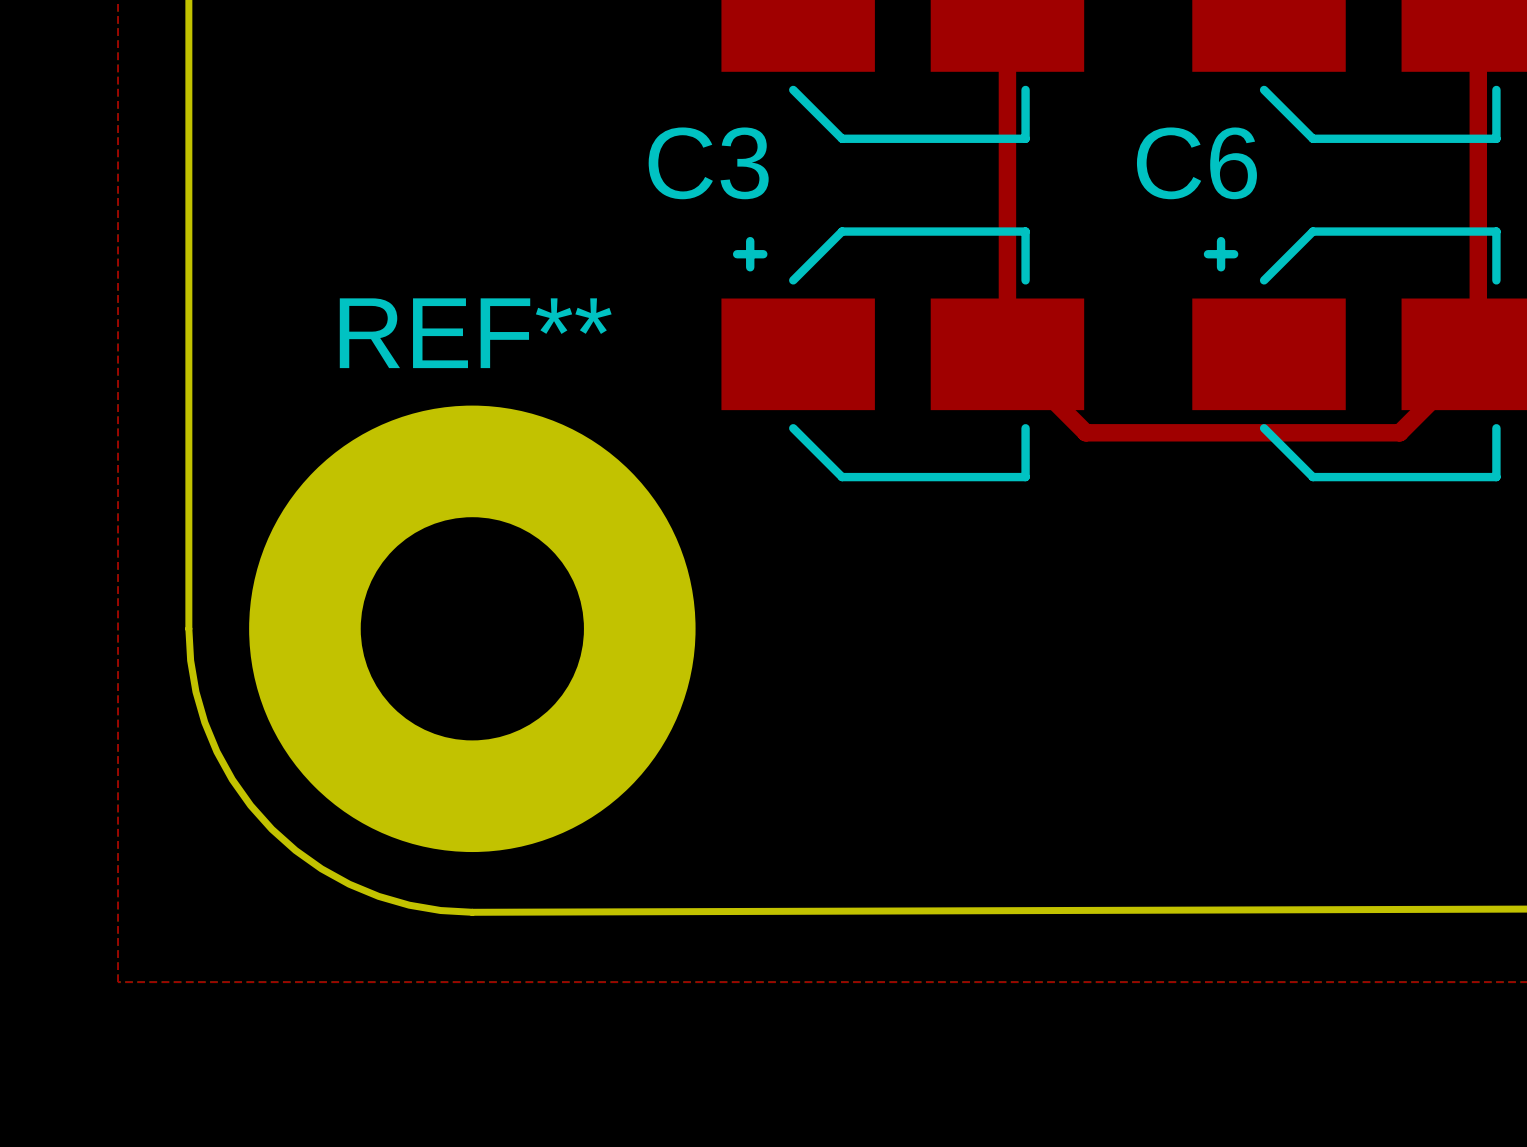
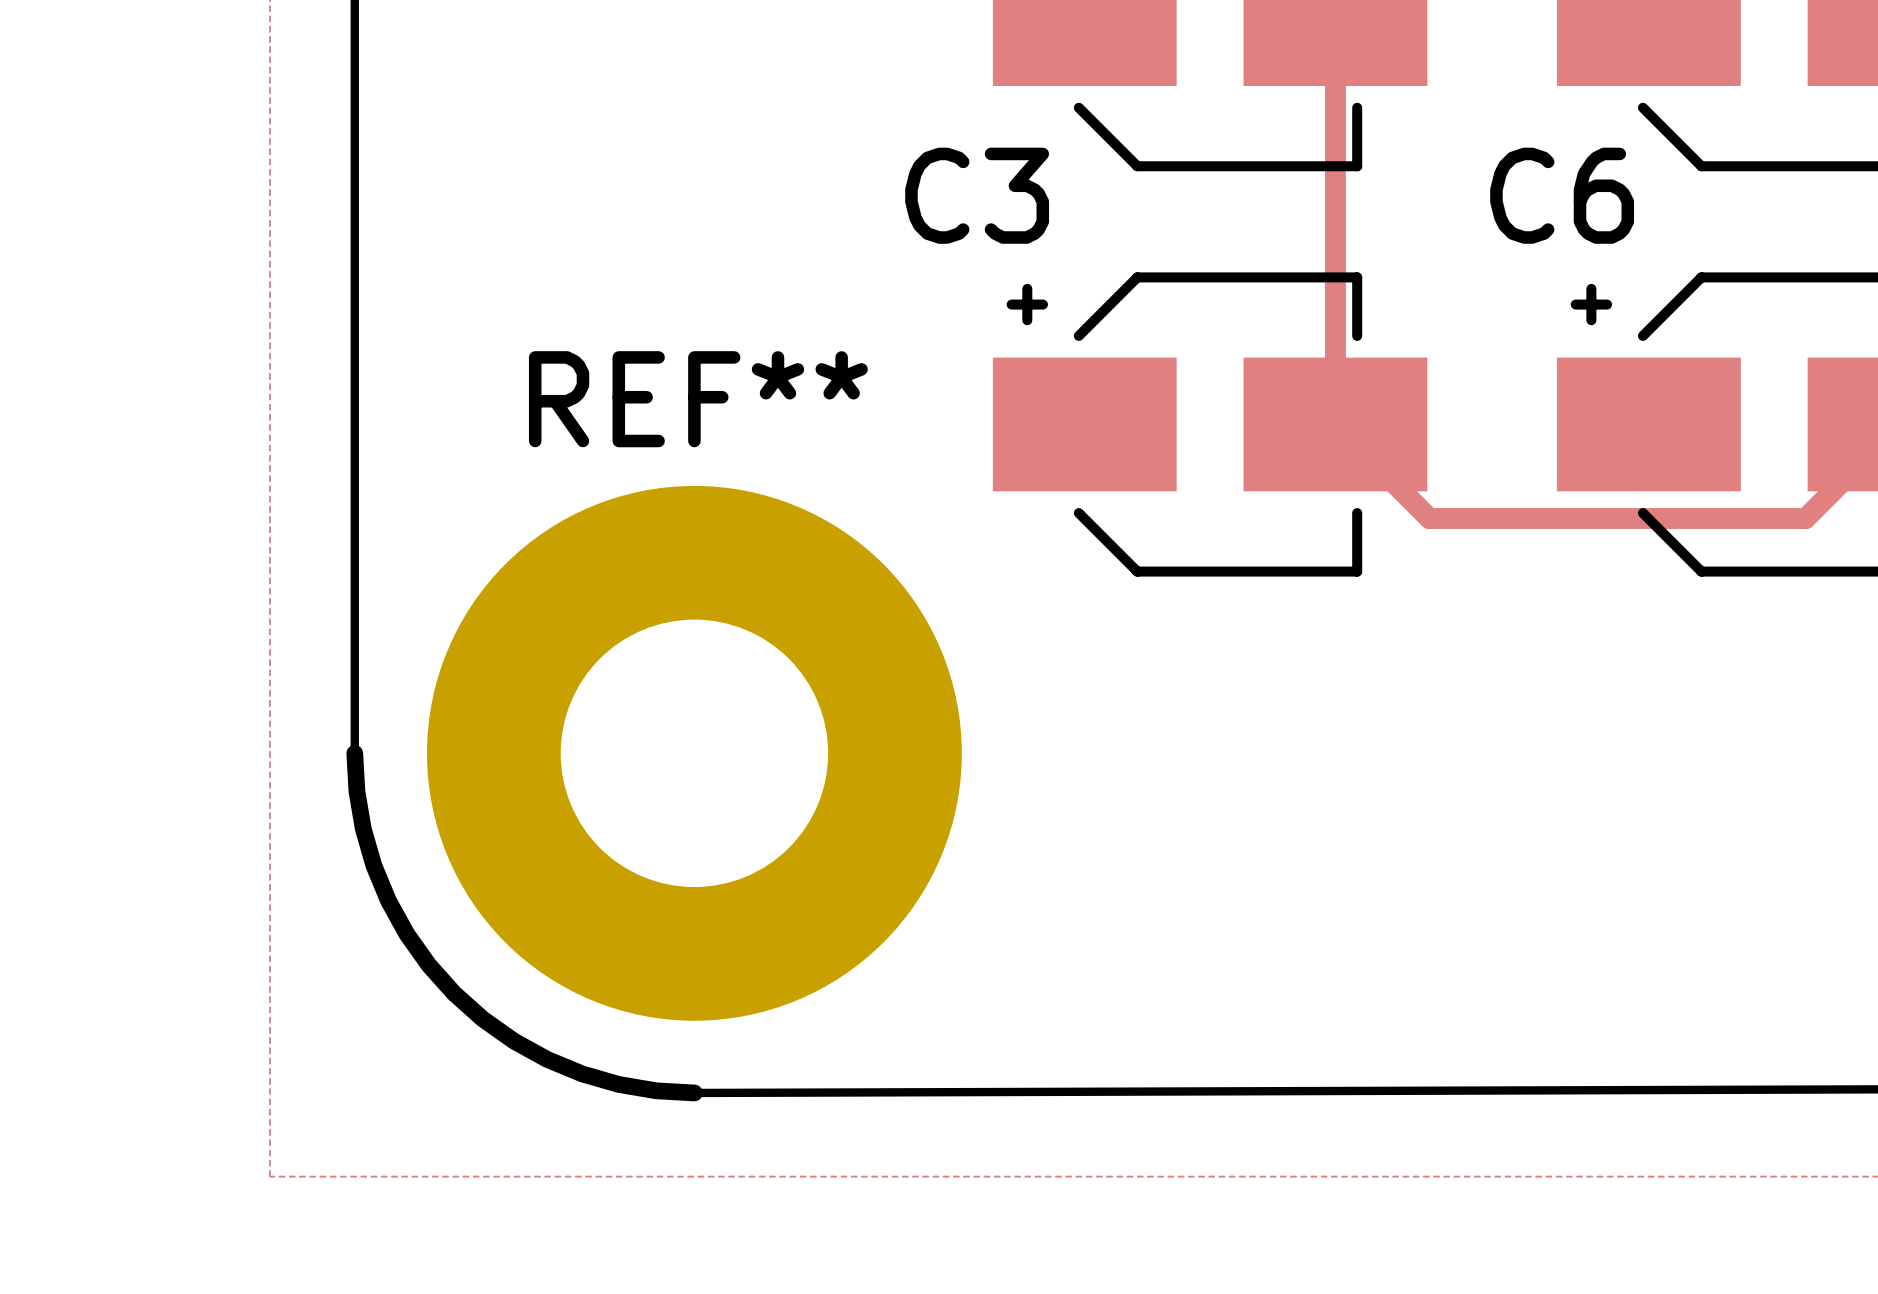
board edge width: thin (188, 628) (190, 660) (195, 691) (204, 722) (216, 751) (232, 779) (250, 805) (271, 829) (295, 850) (321, 868) (349, 884) (378, 896) (409, 905) (440, 910) (472, 912) -> thick (354, 753) (356, 791) (363, 828) (373, 865) (388, 900) (406, 934) (428, 965) (454, 993) (482, 1018) (513, 1040) (547, 1059) (582, 1073) (618, 1084) (656, 1090) (694, 1092)

